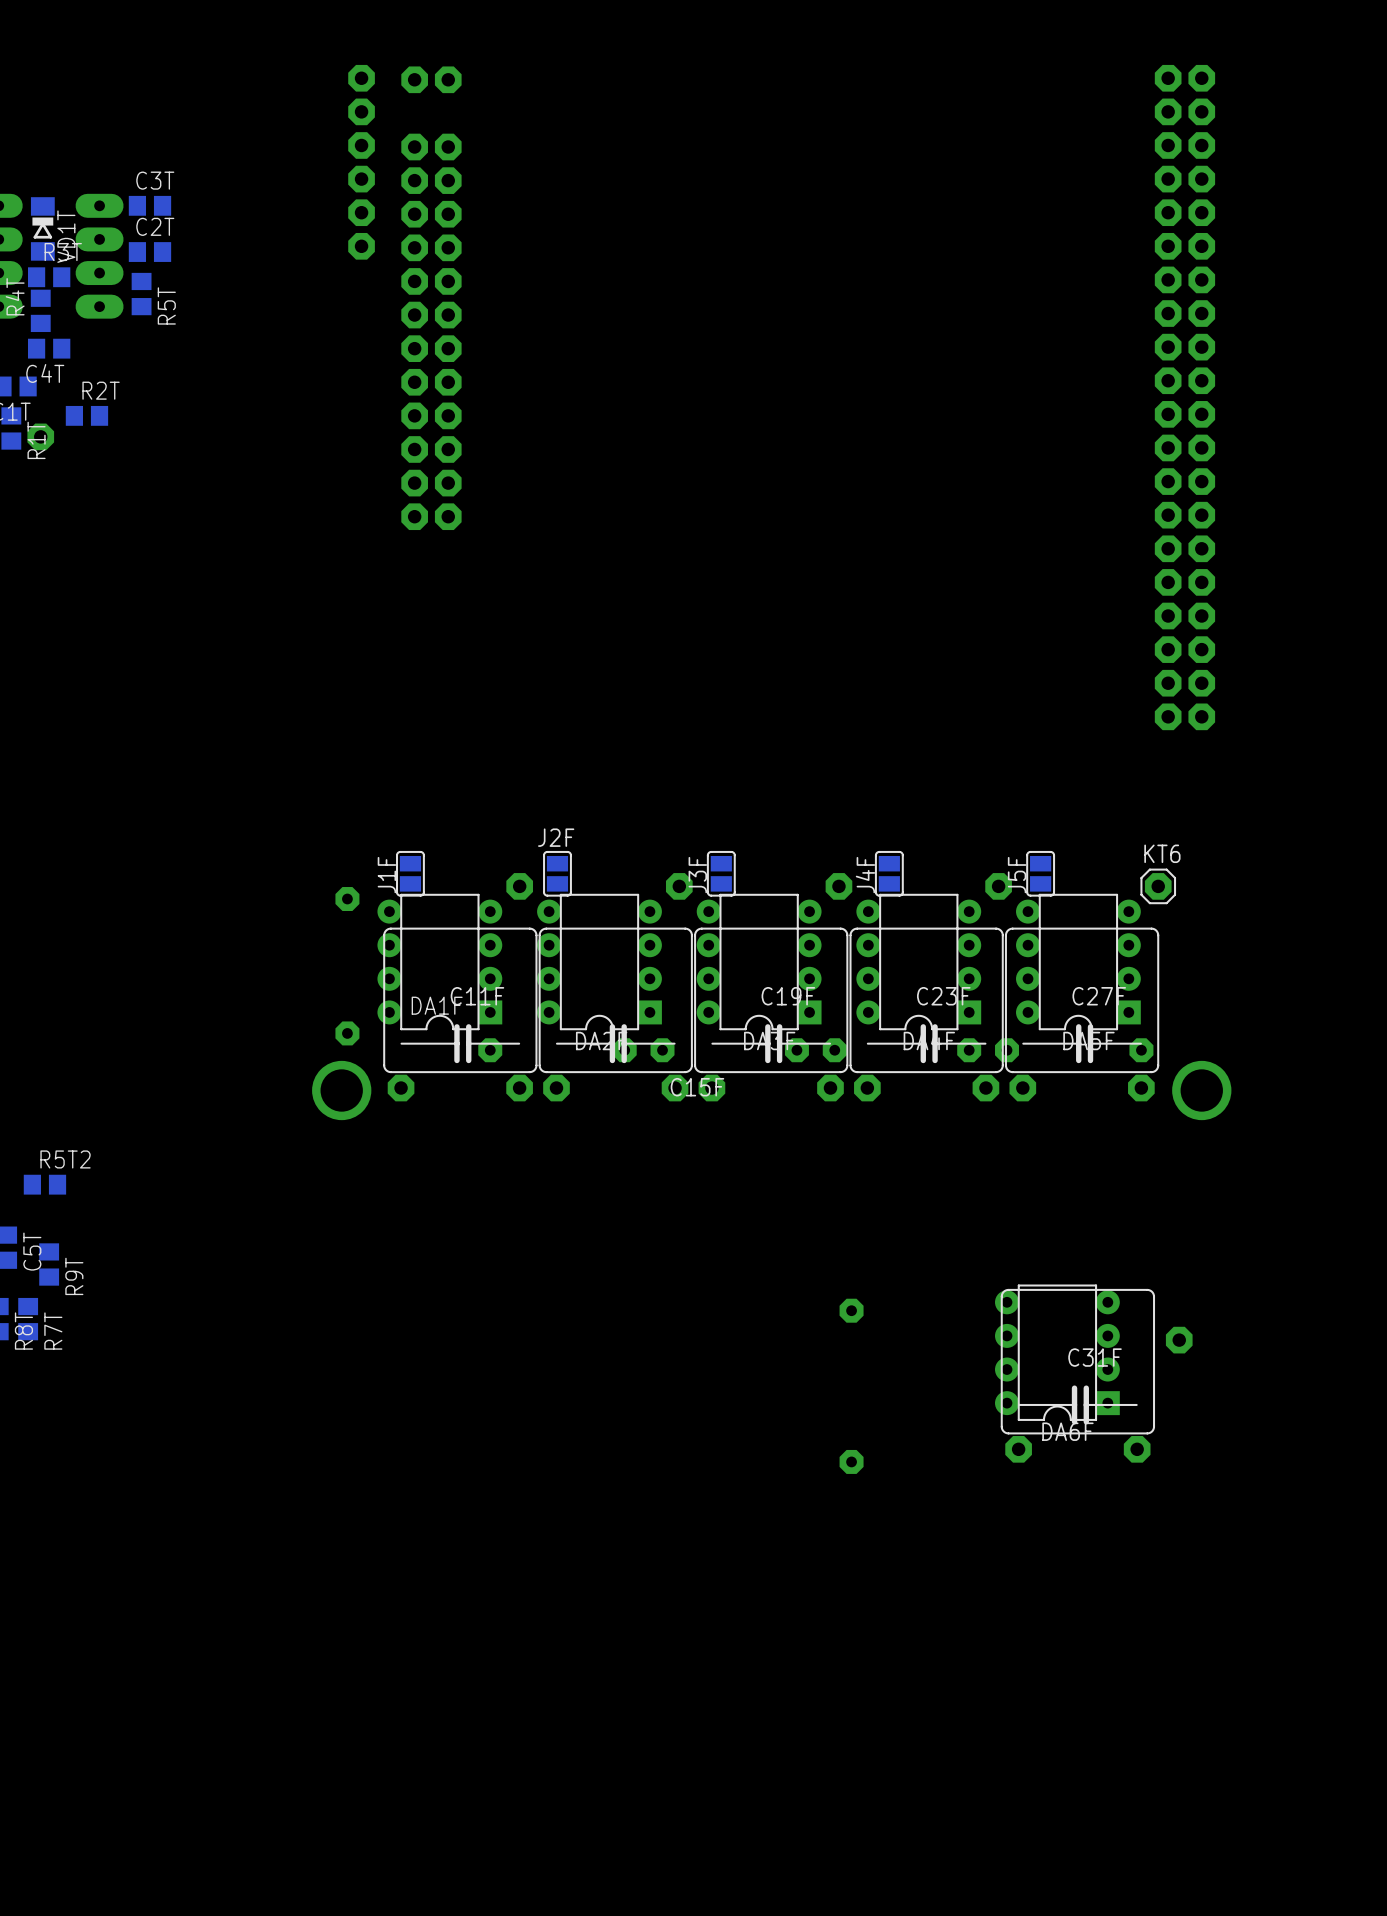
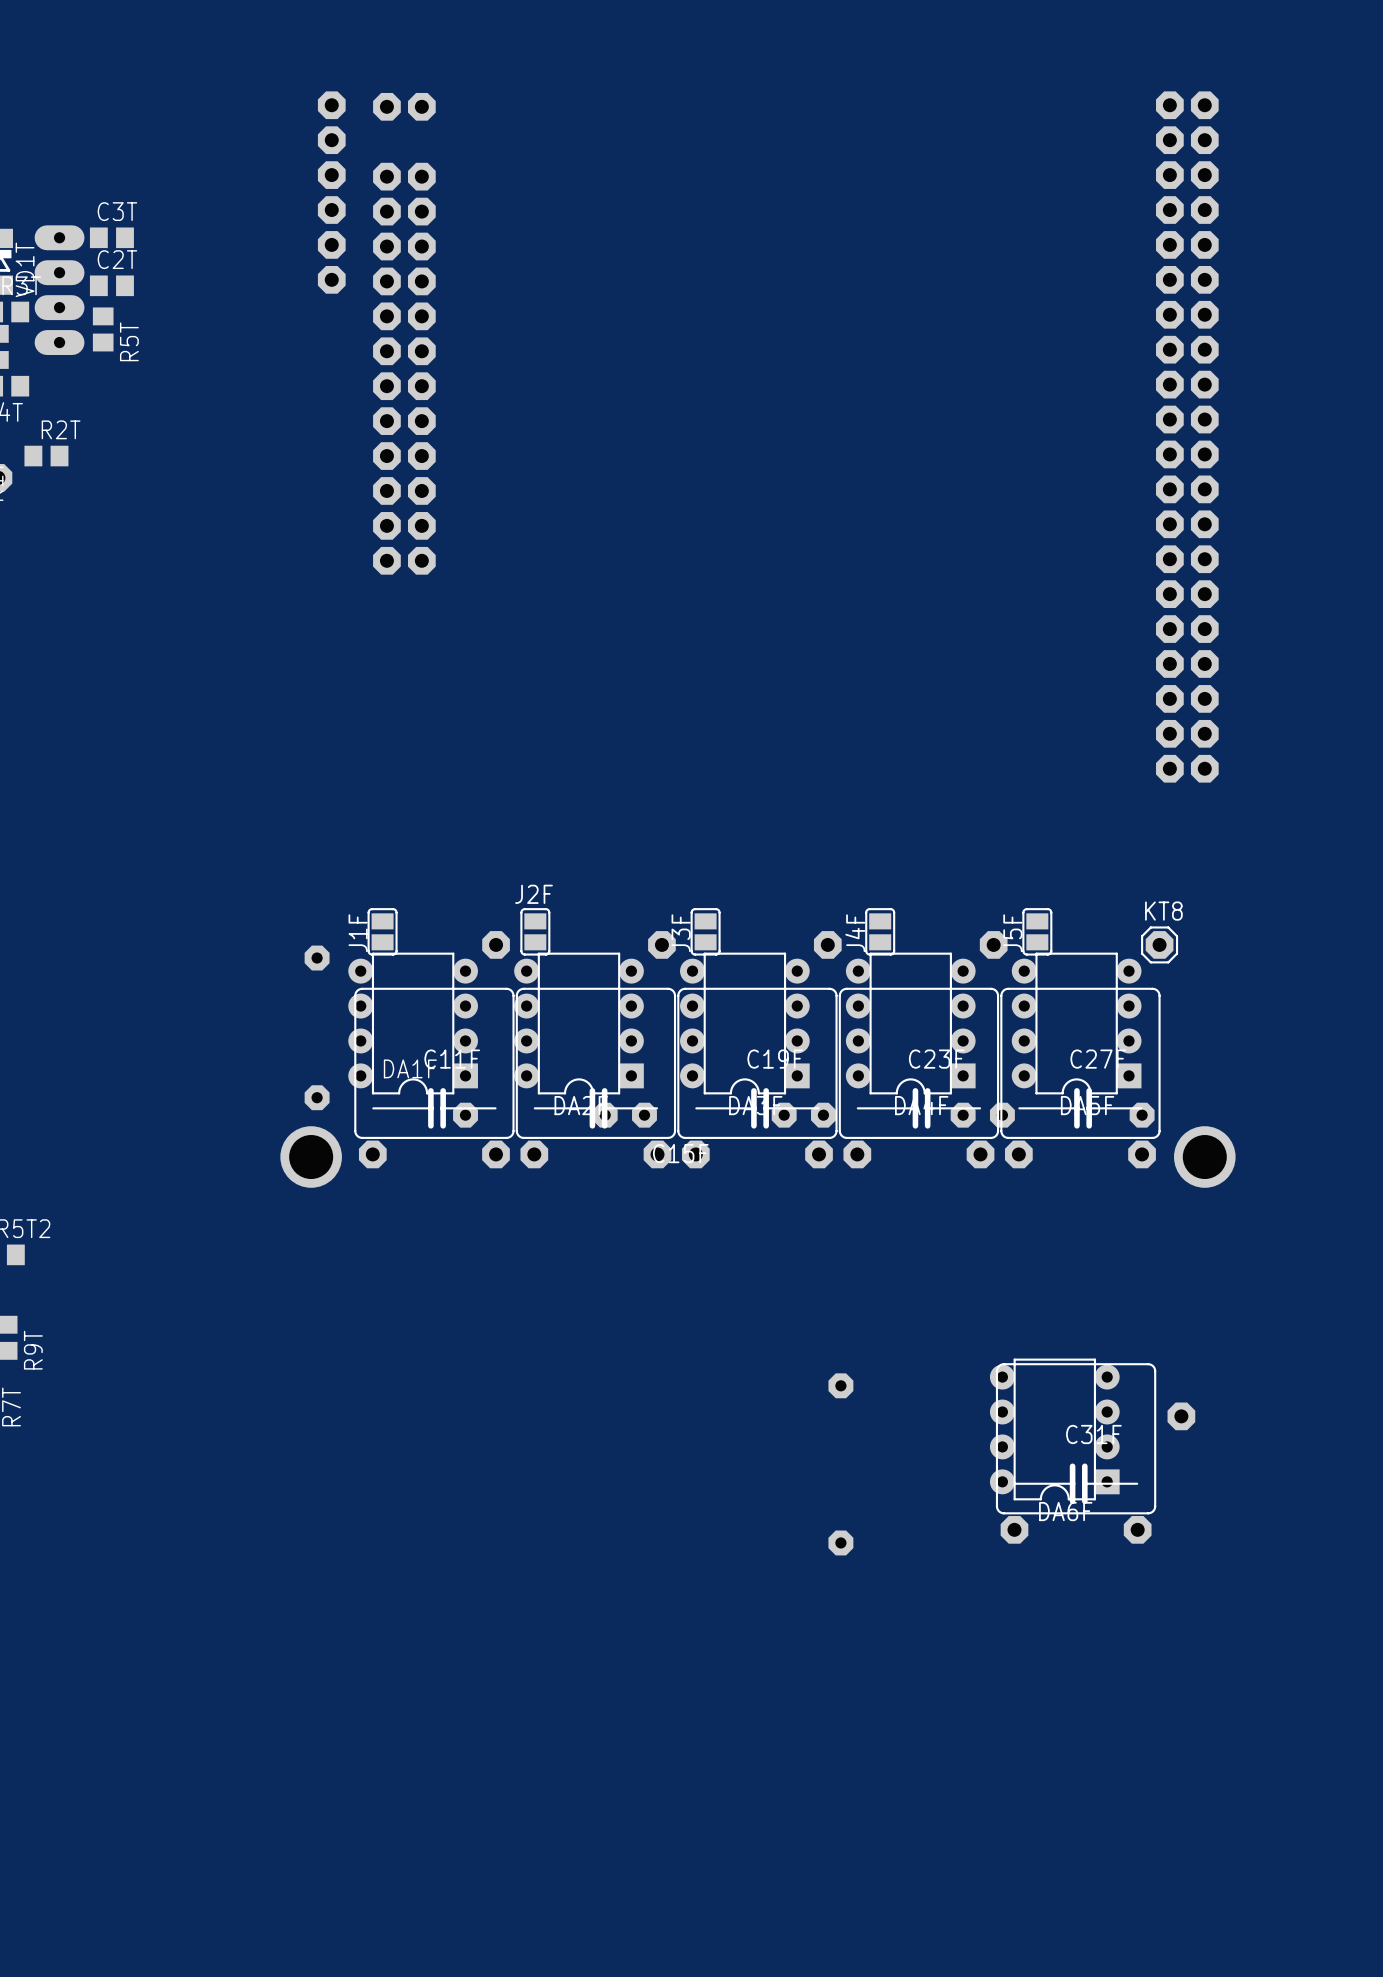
KT6 name: KT6 (1162, 853) -> KT8 (1163, 911)

